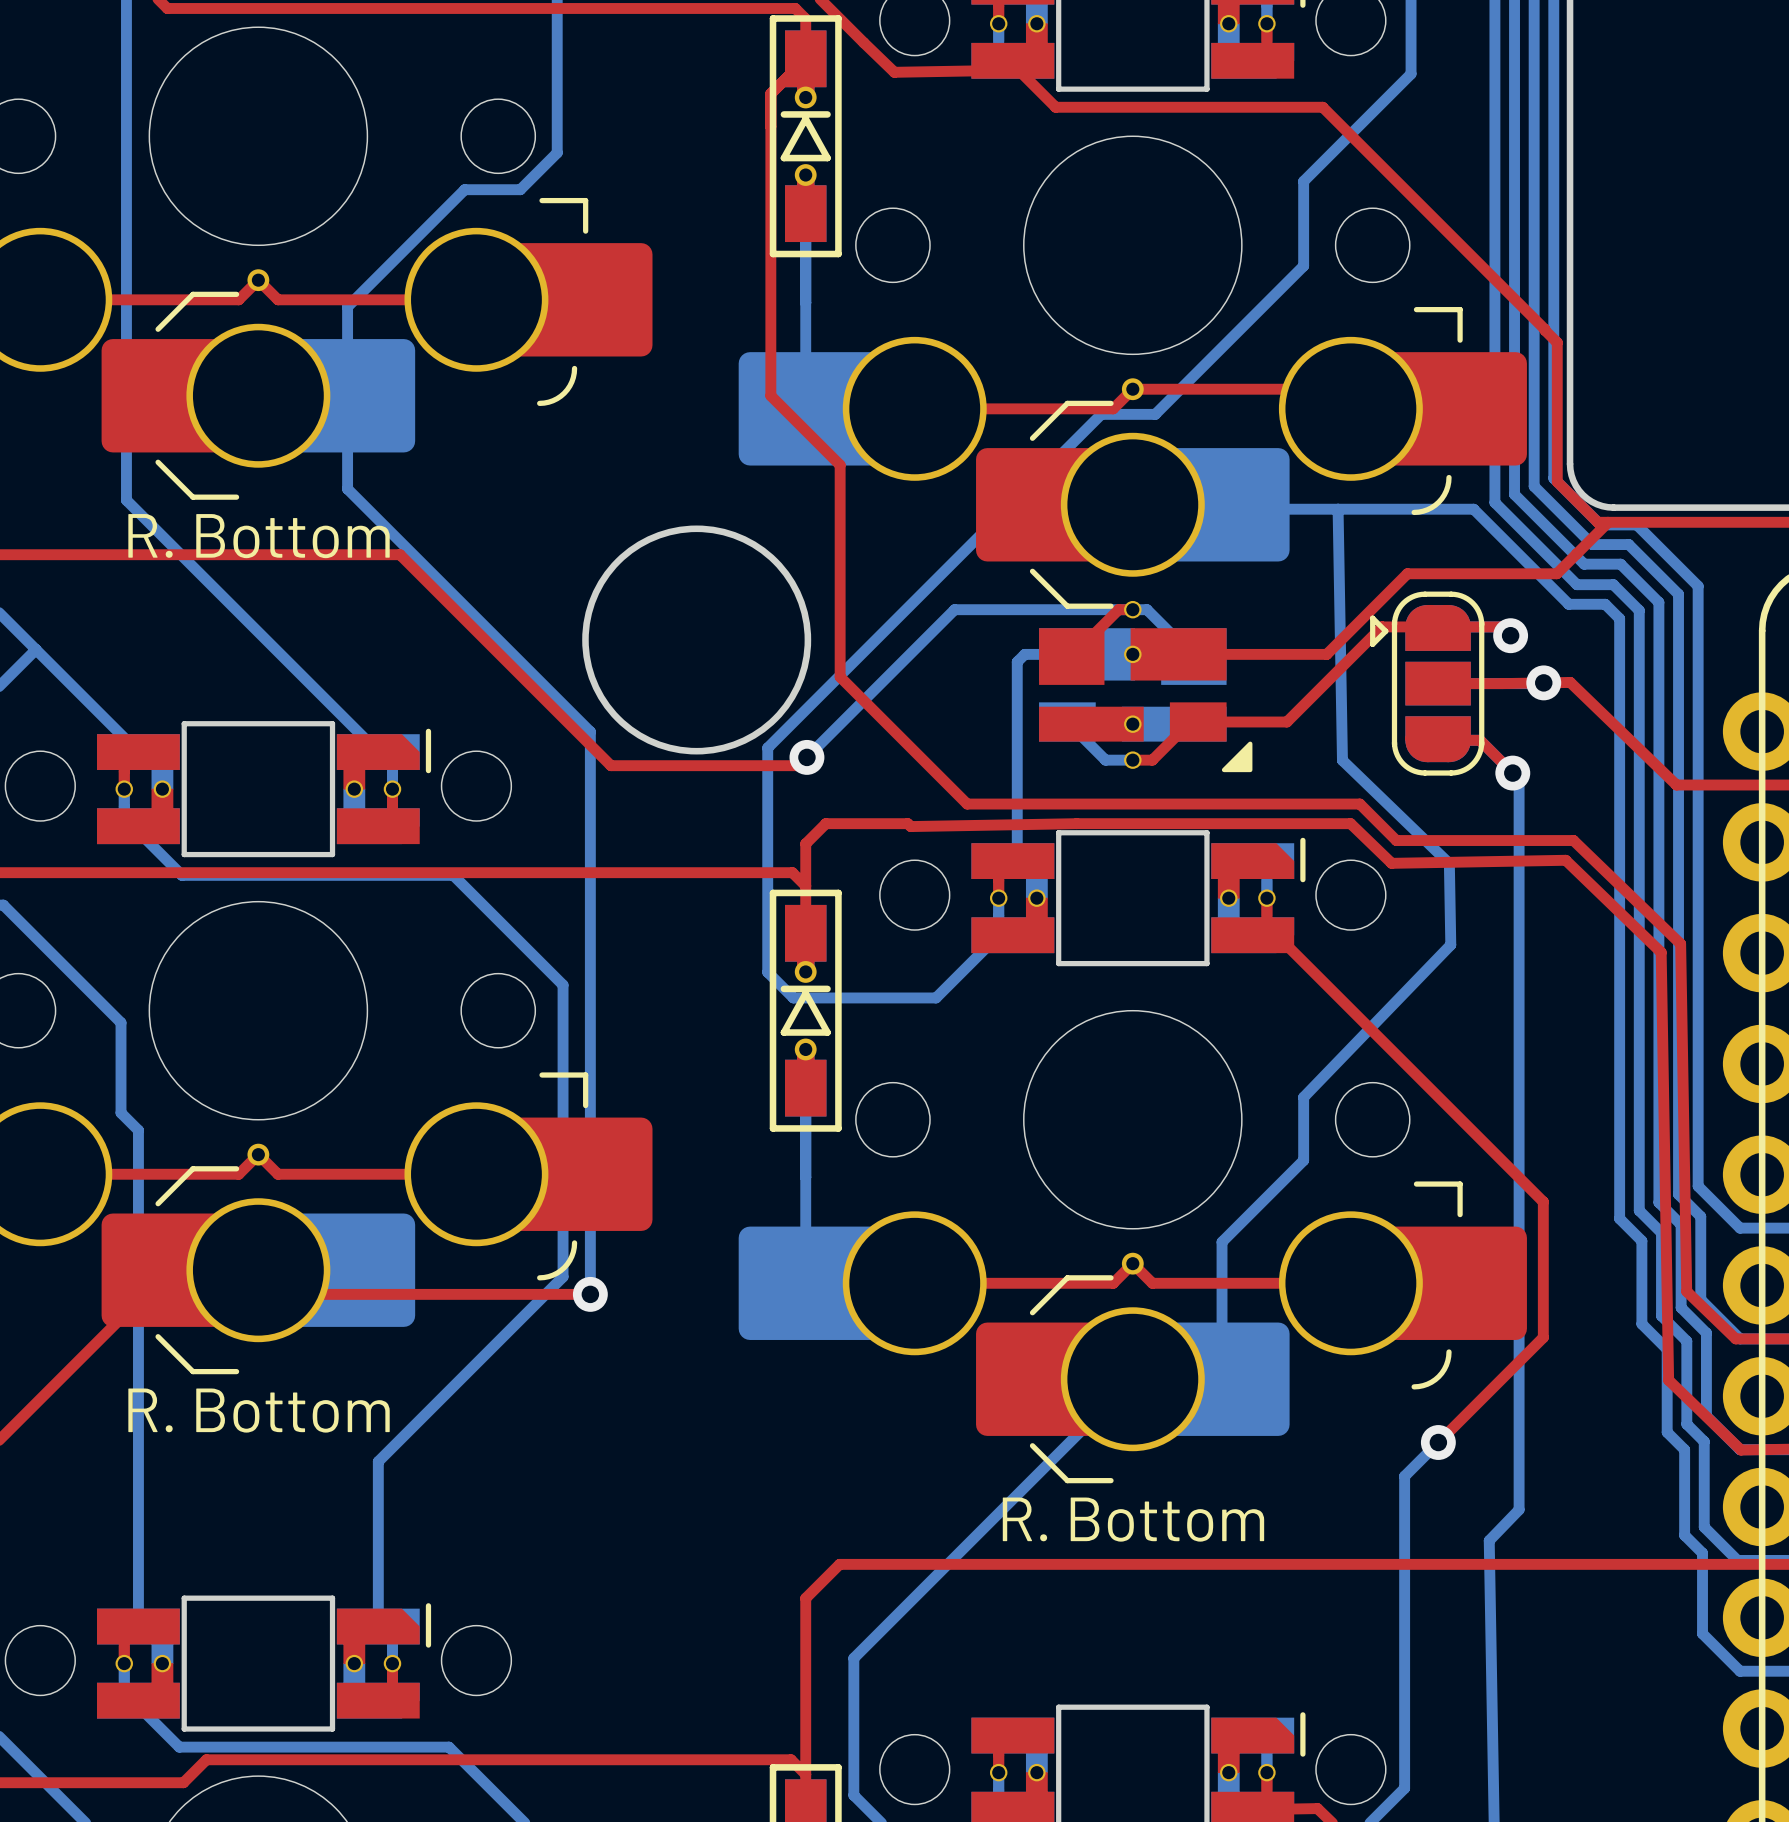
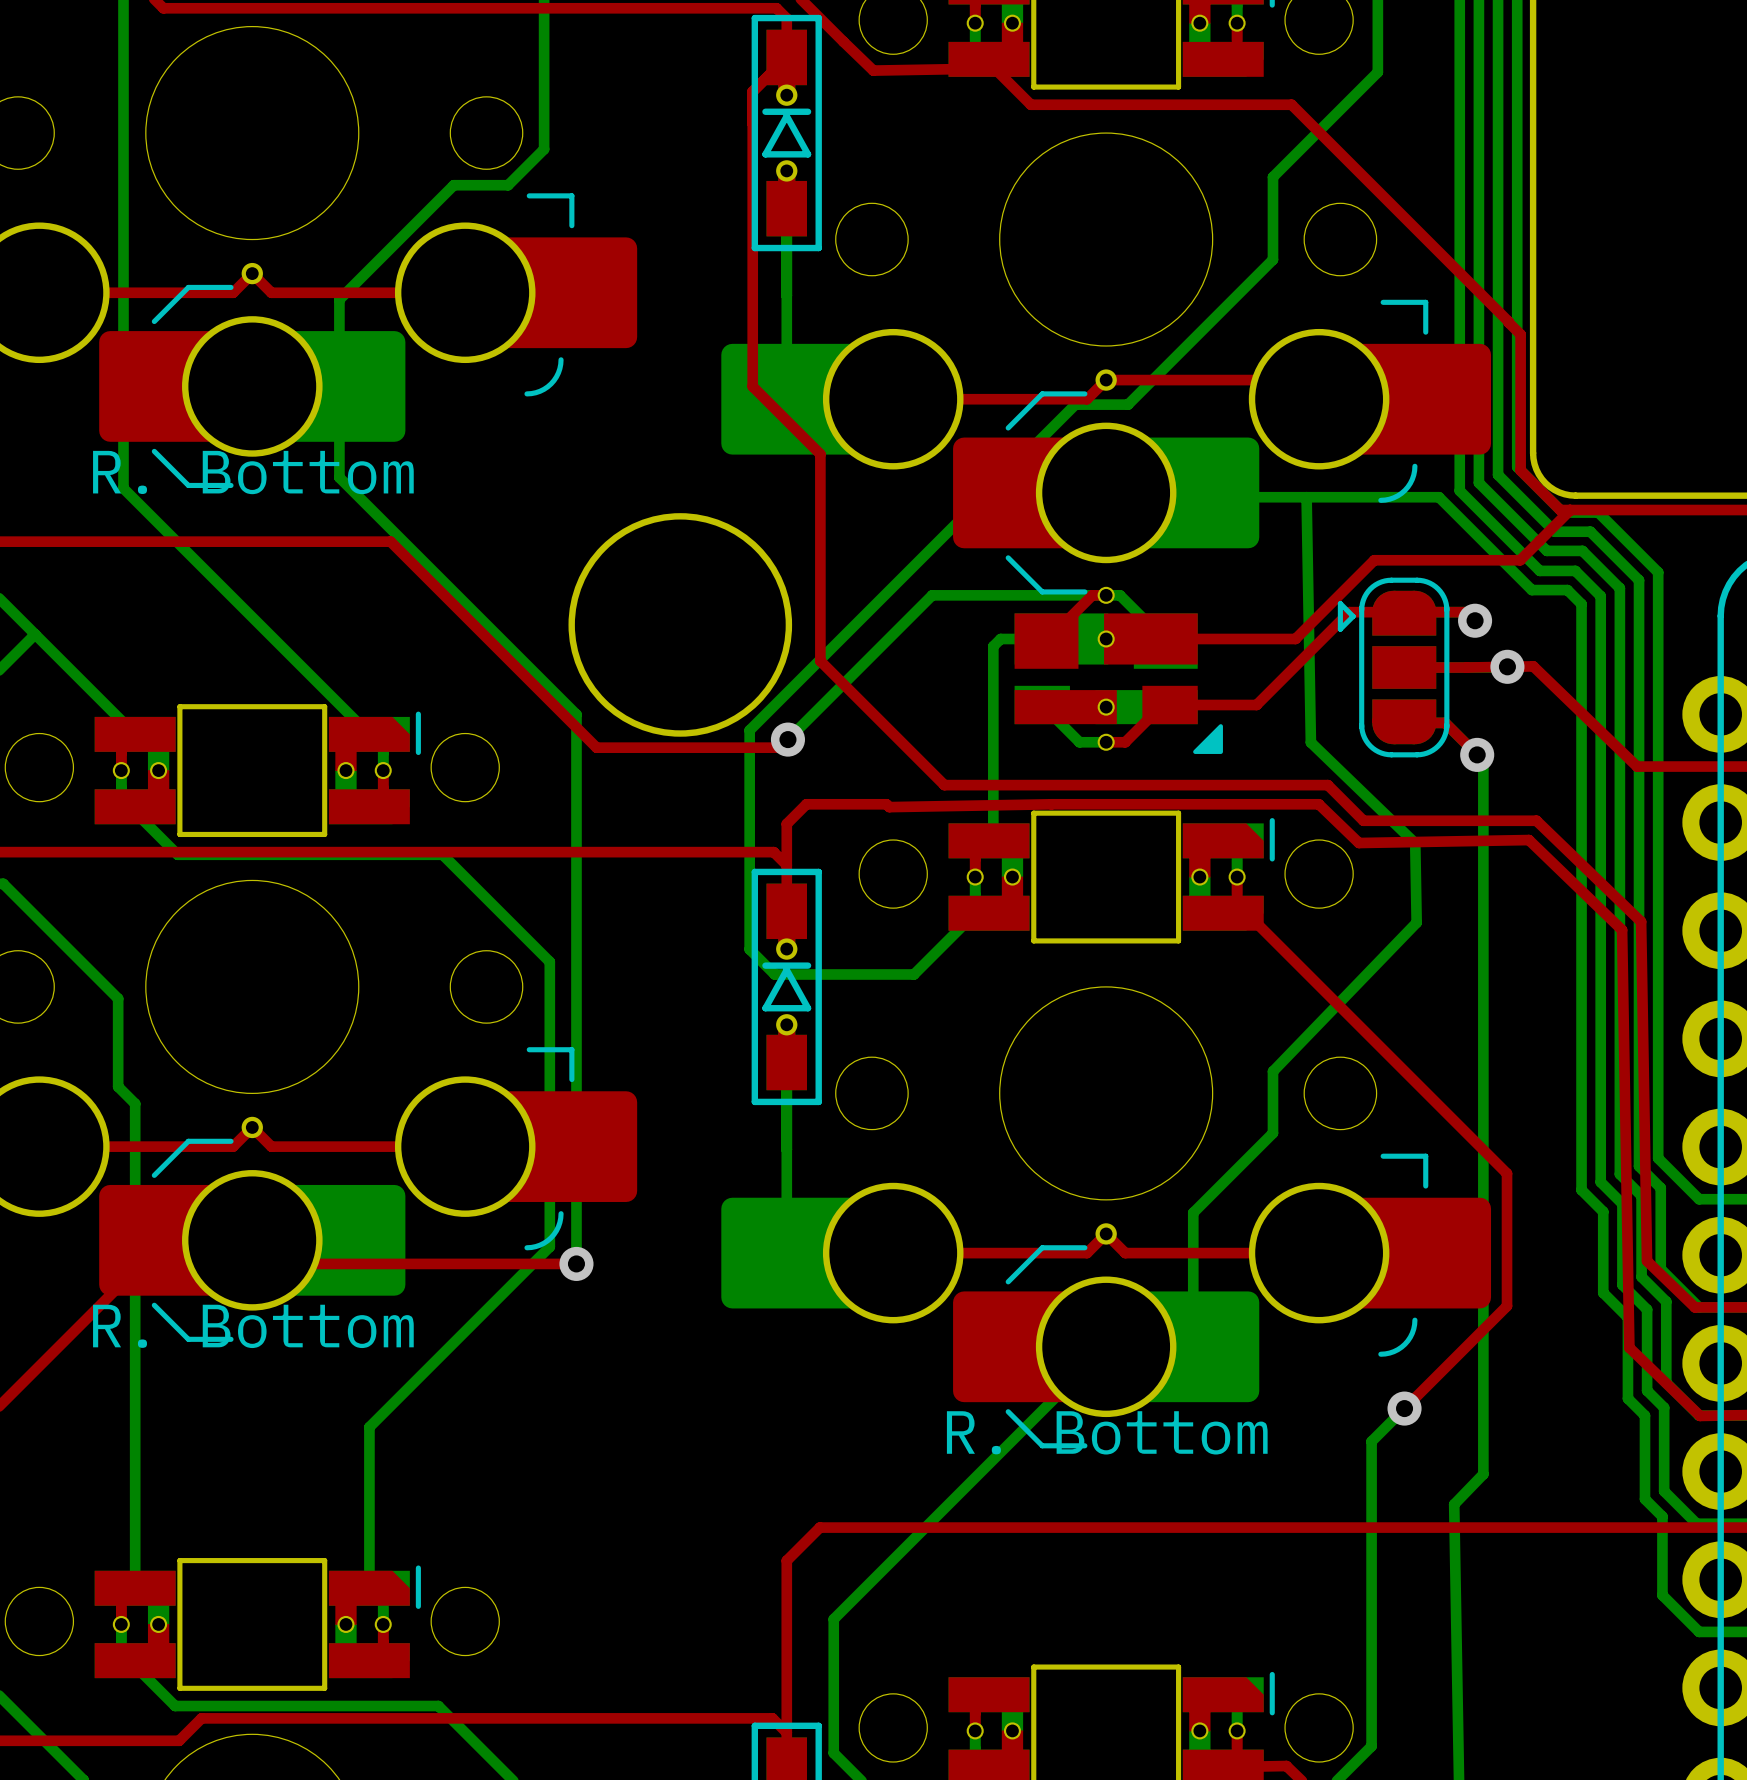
text position: R. Bottom (259, 536) -> R. Bottom (253, 472)
text position: R. Bottom (259, 1410) -> R. Bottom (253, 1326)
text position: R. Bottom (1133, 1519) -> R. Bottom (1107, 1432)

